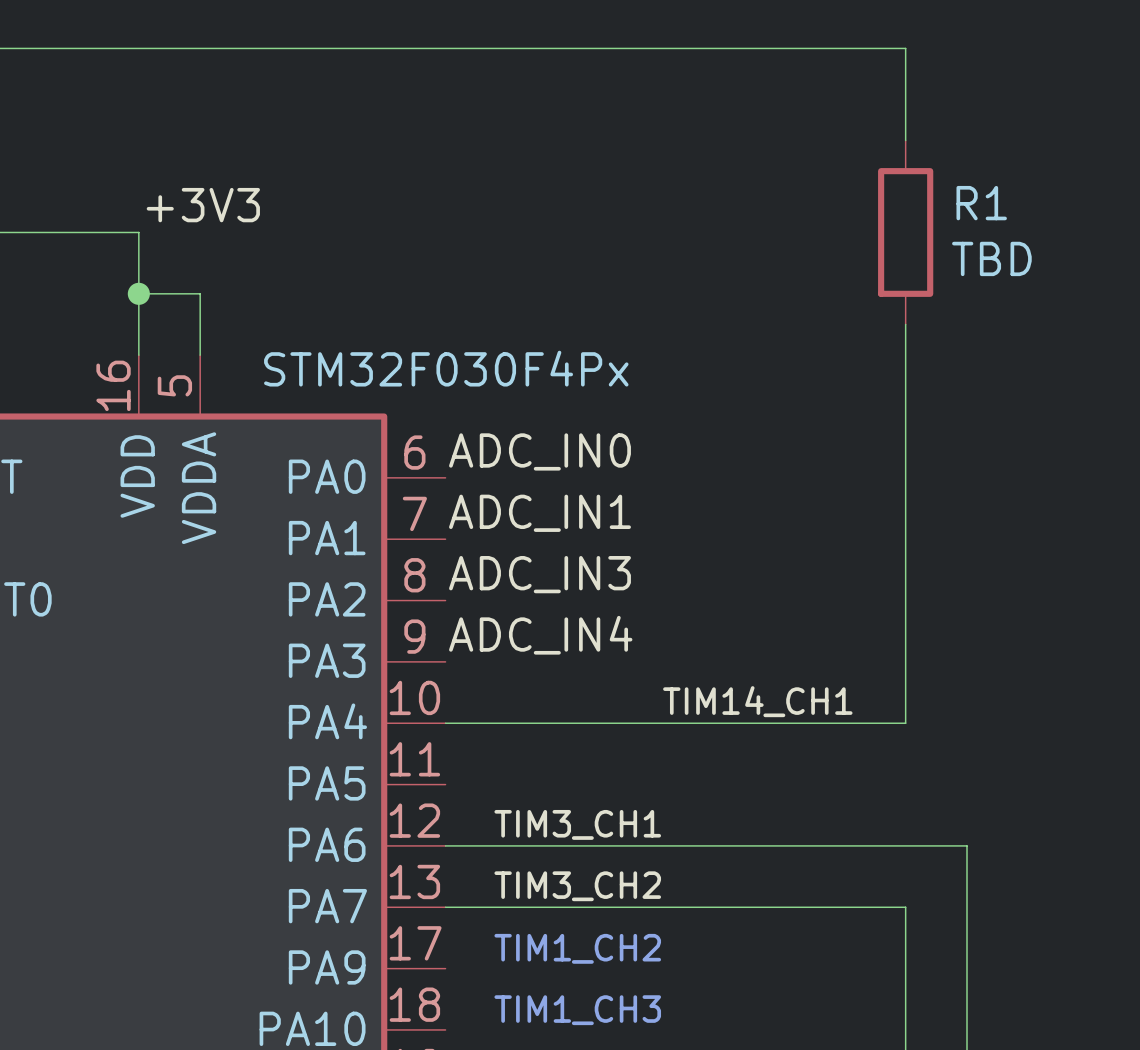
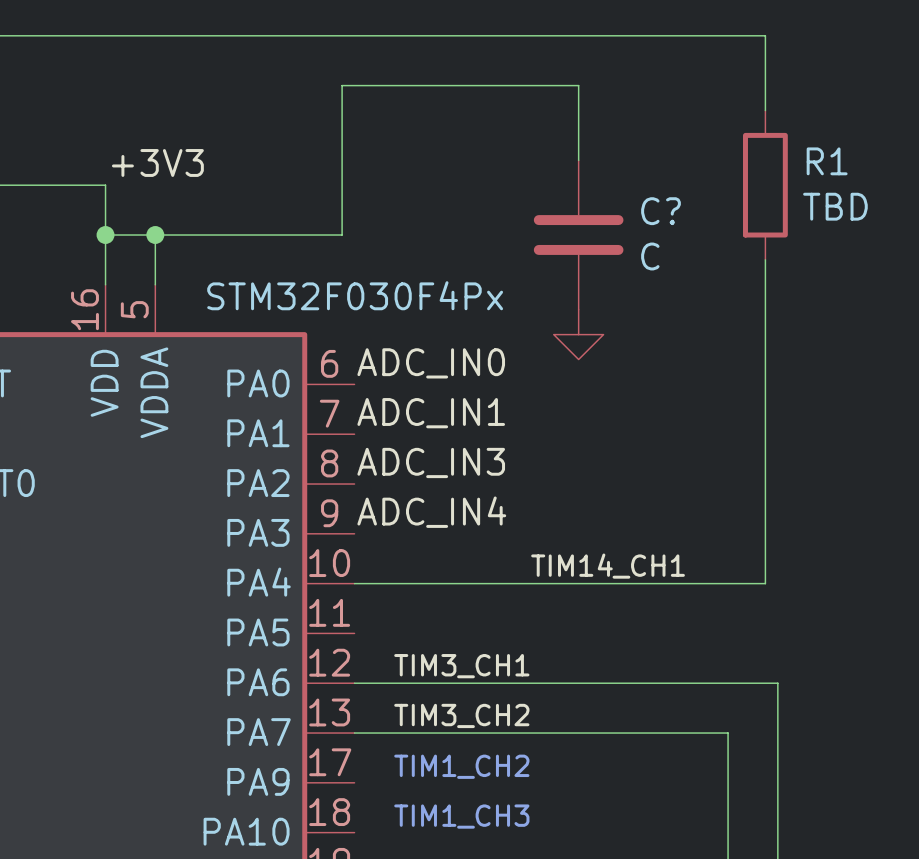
wire: (905, 48) (905, 140) -> (728, 35) (765, 35) (765, 110)
wire: none -> (578, 160) (578, 85) (342, 85) (342, 235) (155, 235)
R1 position: (905, 232) -> (765, 185)
junction: none -> (155, 235)
C?: none -> C (578, 235)
wire: (905, 324) (905, 723) -> (765, 259) (765, 583) (728, 583)
power symbol: none -> (578, 334)

